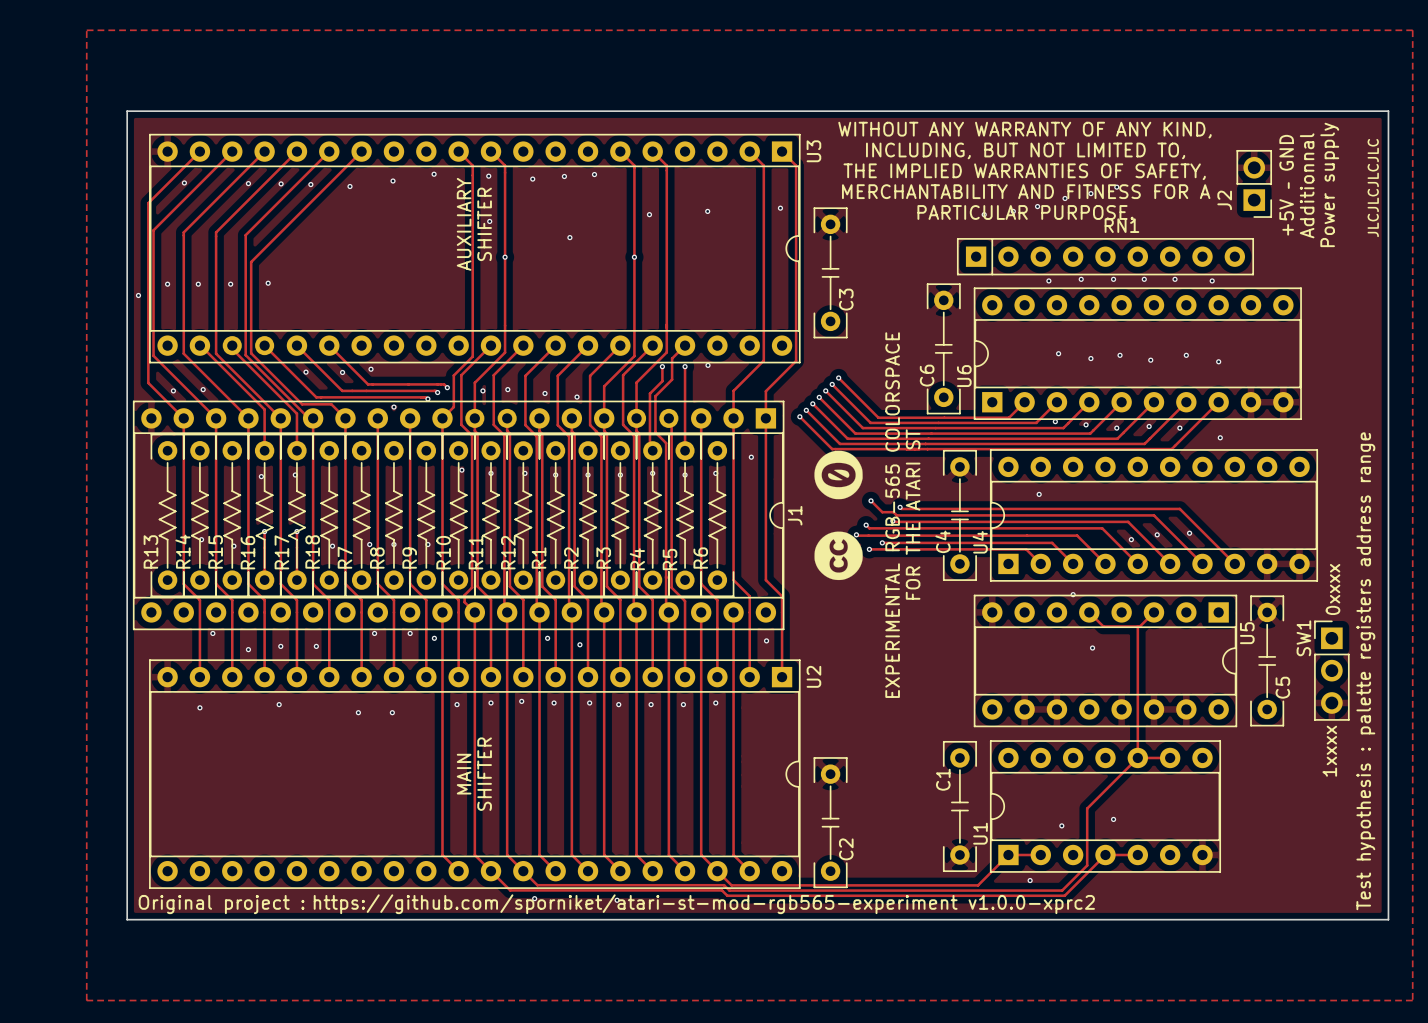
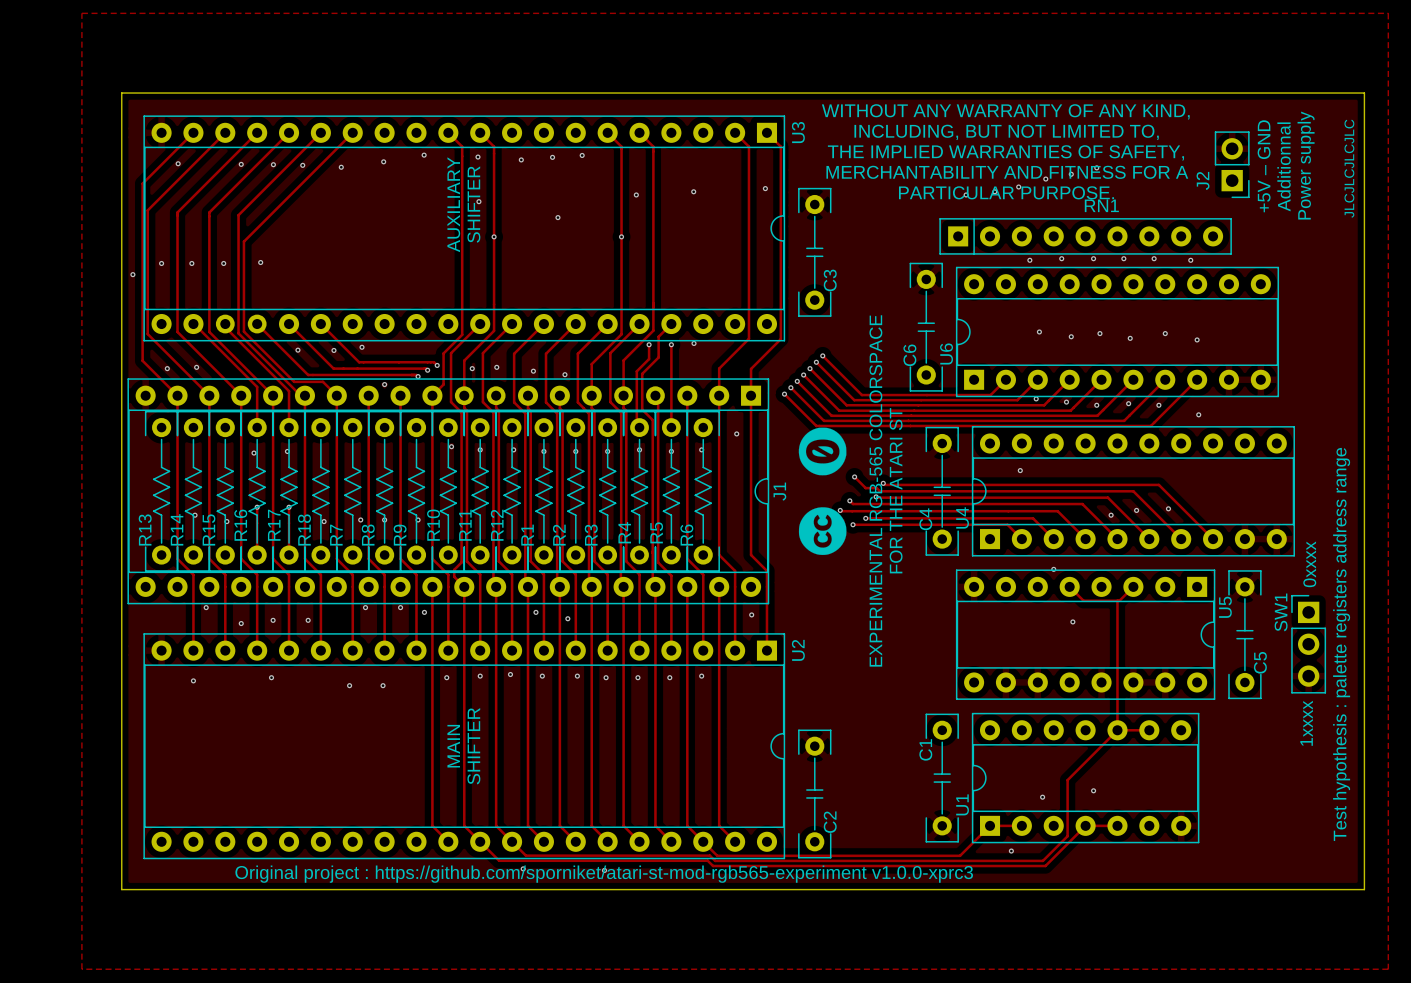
text: Original project : https://github.com/sporniket/atari-st-mod-rgb565-experiment v1.0.0-xprc2 (616, 904) -> Original project : https://github.com/sporniket/atari-st-mod-rgb565-experiment v1.0.0-xprc3 (604, 874)

